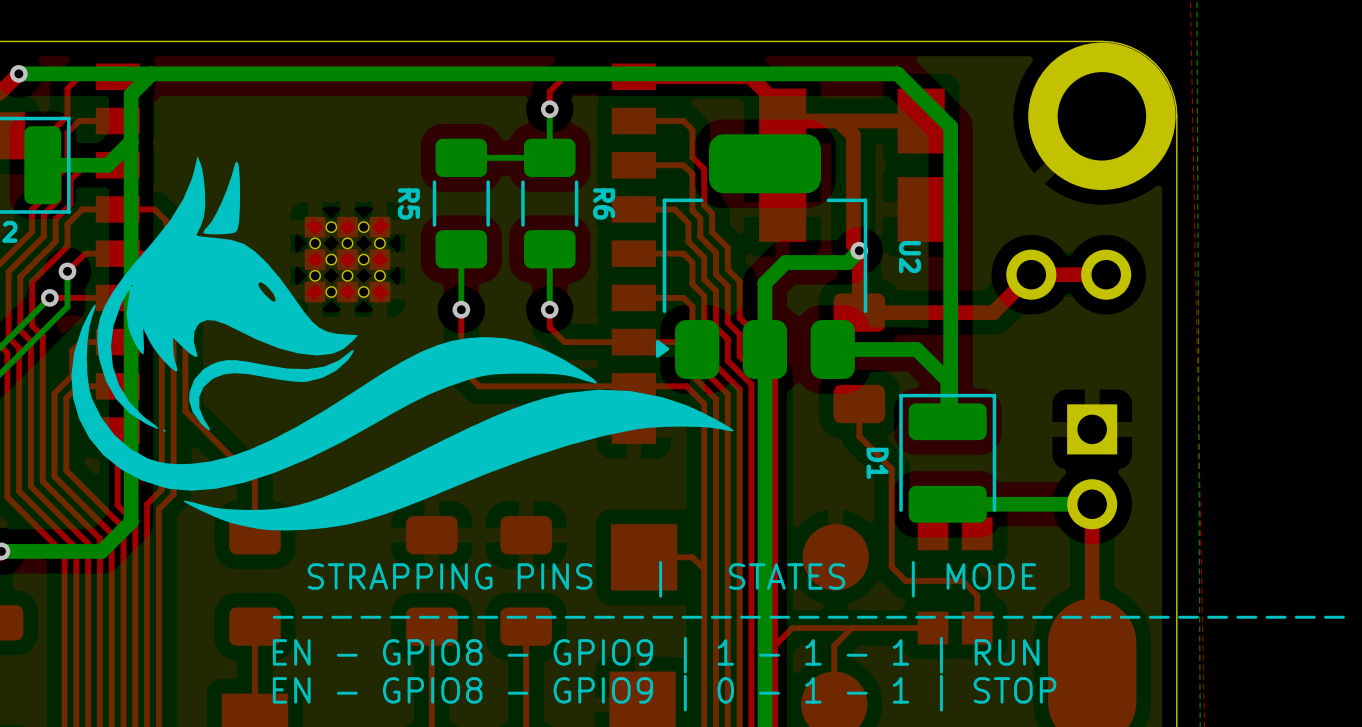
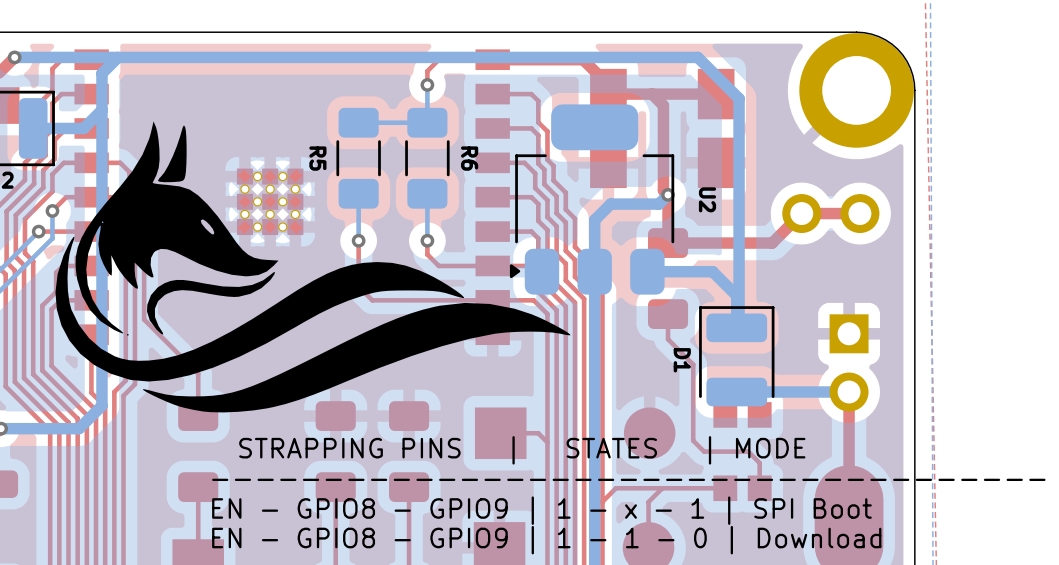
text: EN - GPIO8 - GPIO9 | 1 - 1 - 1 | RUN (656, 655) -> EN - GPIO8 - GPIO9 | 1 - x - 1 | SPI Boot (541, 510)
text: EN - GPIO8 - GPIO9 | 0 - 1 - 1 | STOP (664, 693) -> EN - GPIO8 - GPIO9 | 1 - 1 - 0 | Download (546, 540)

